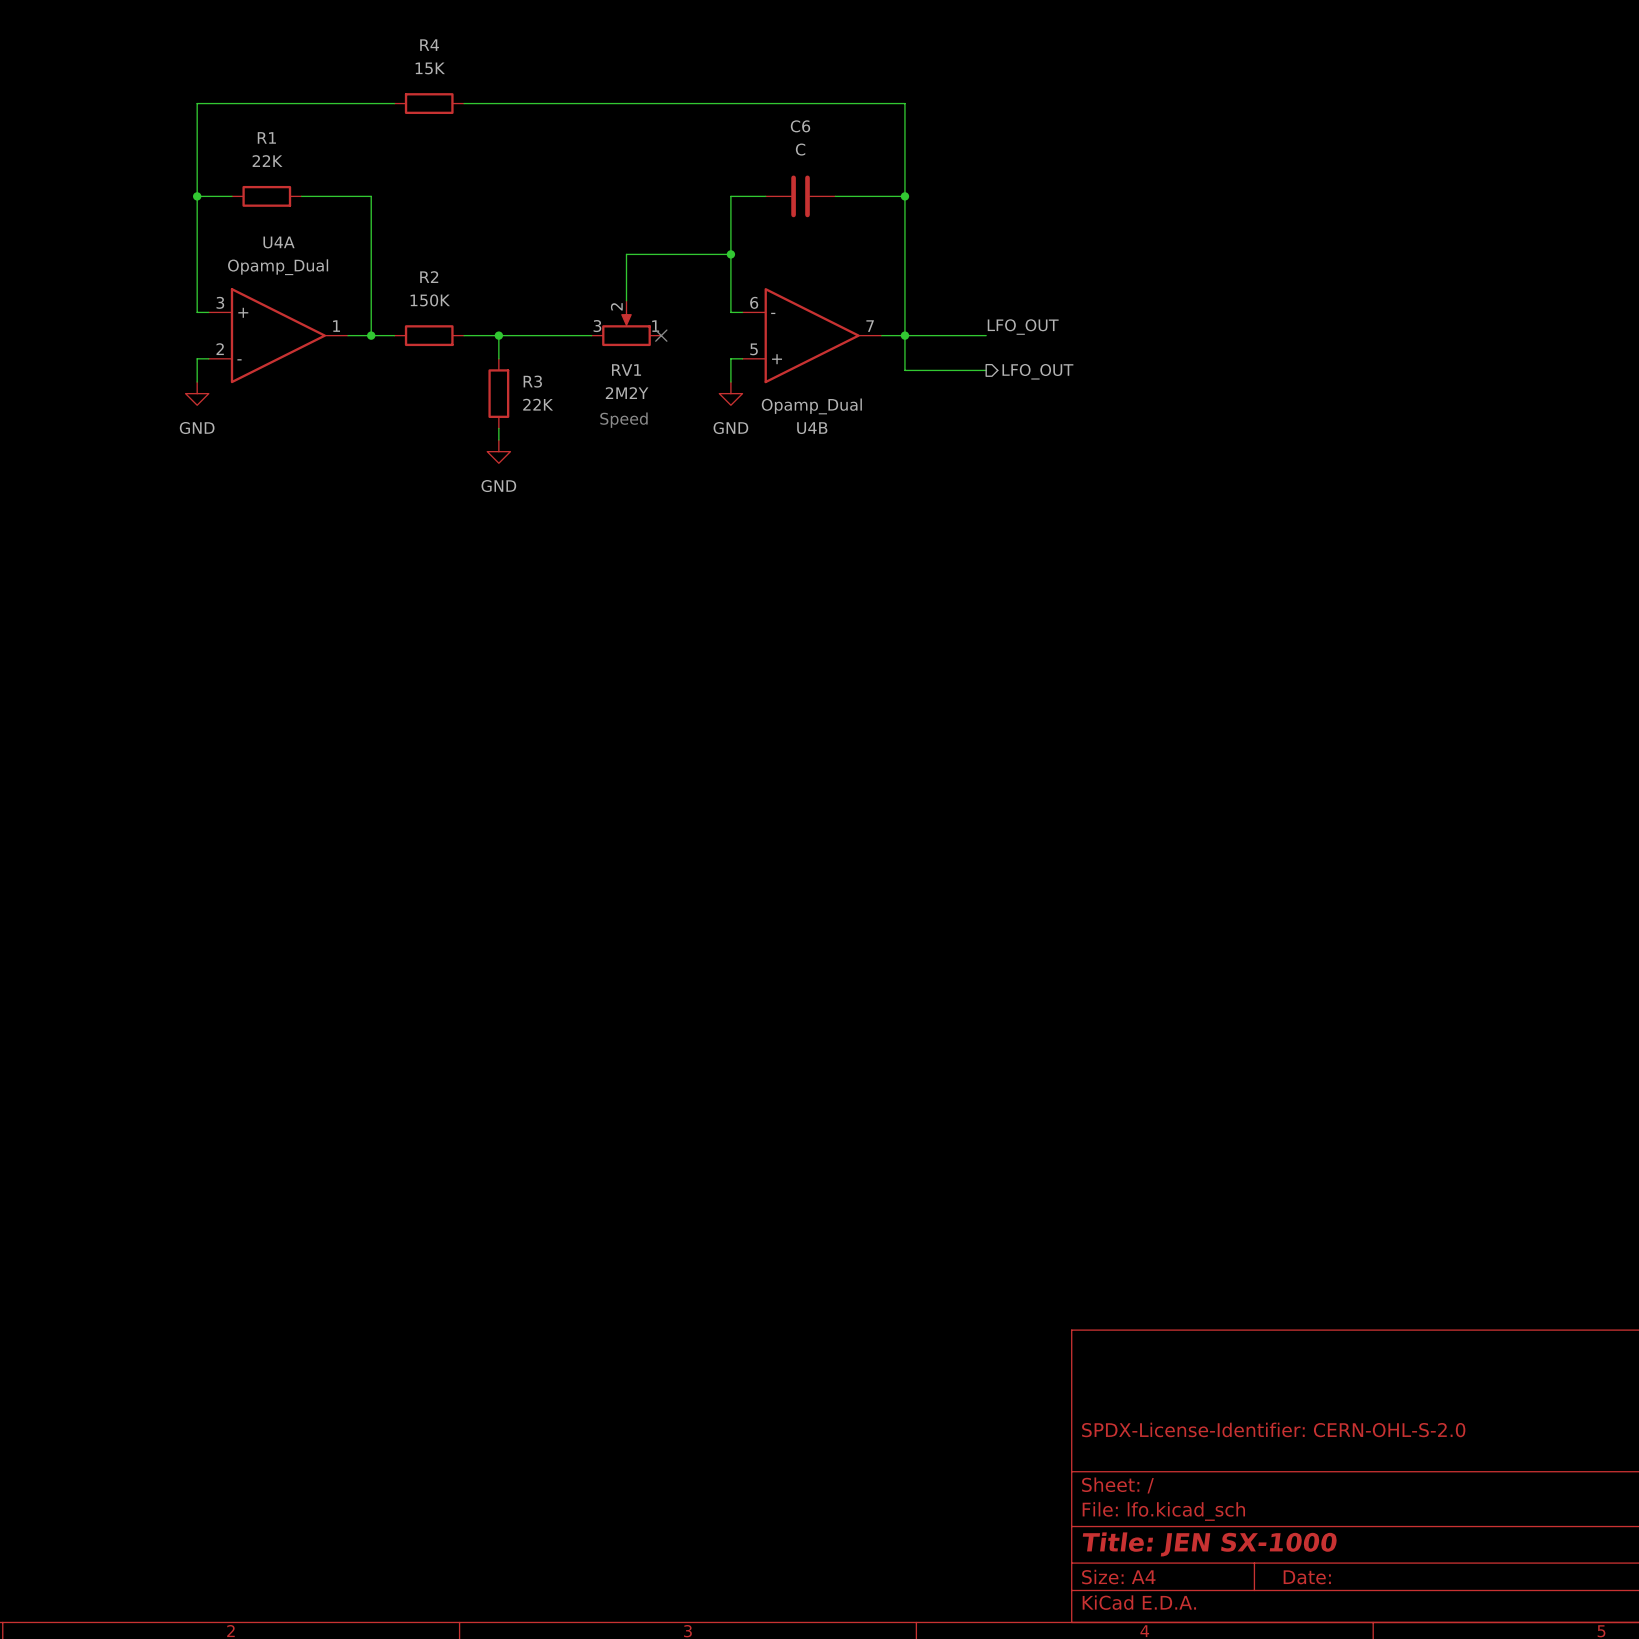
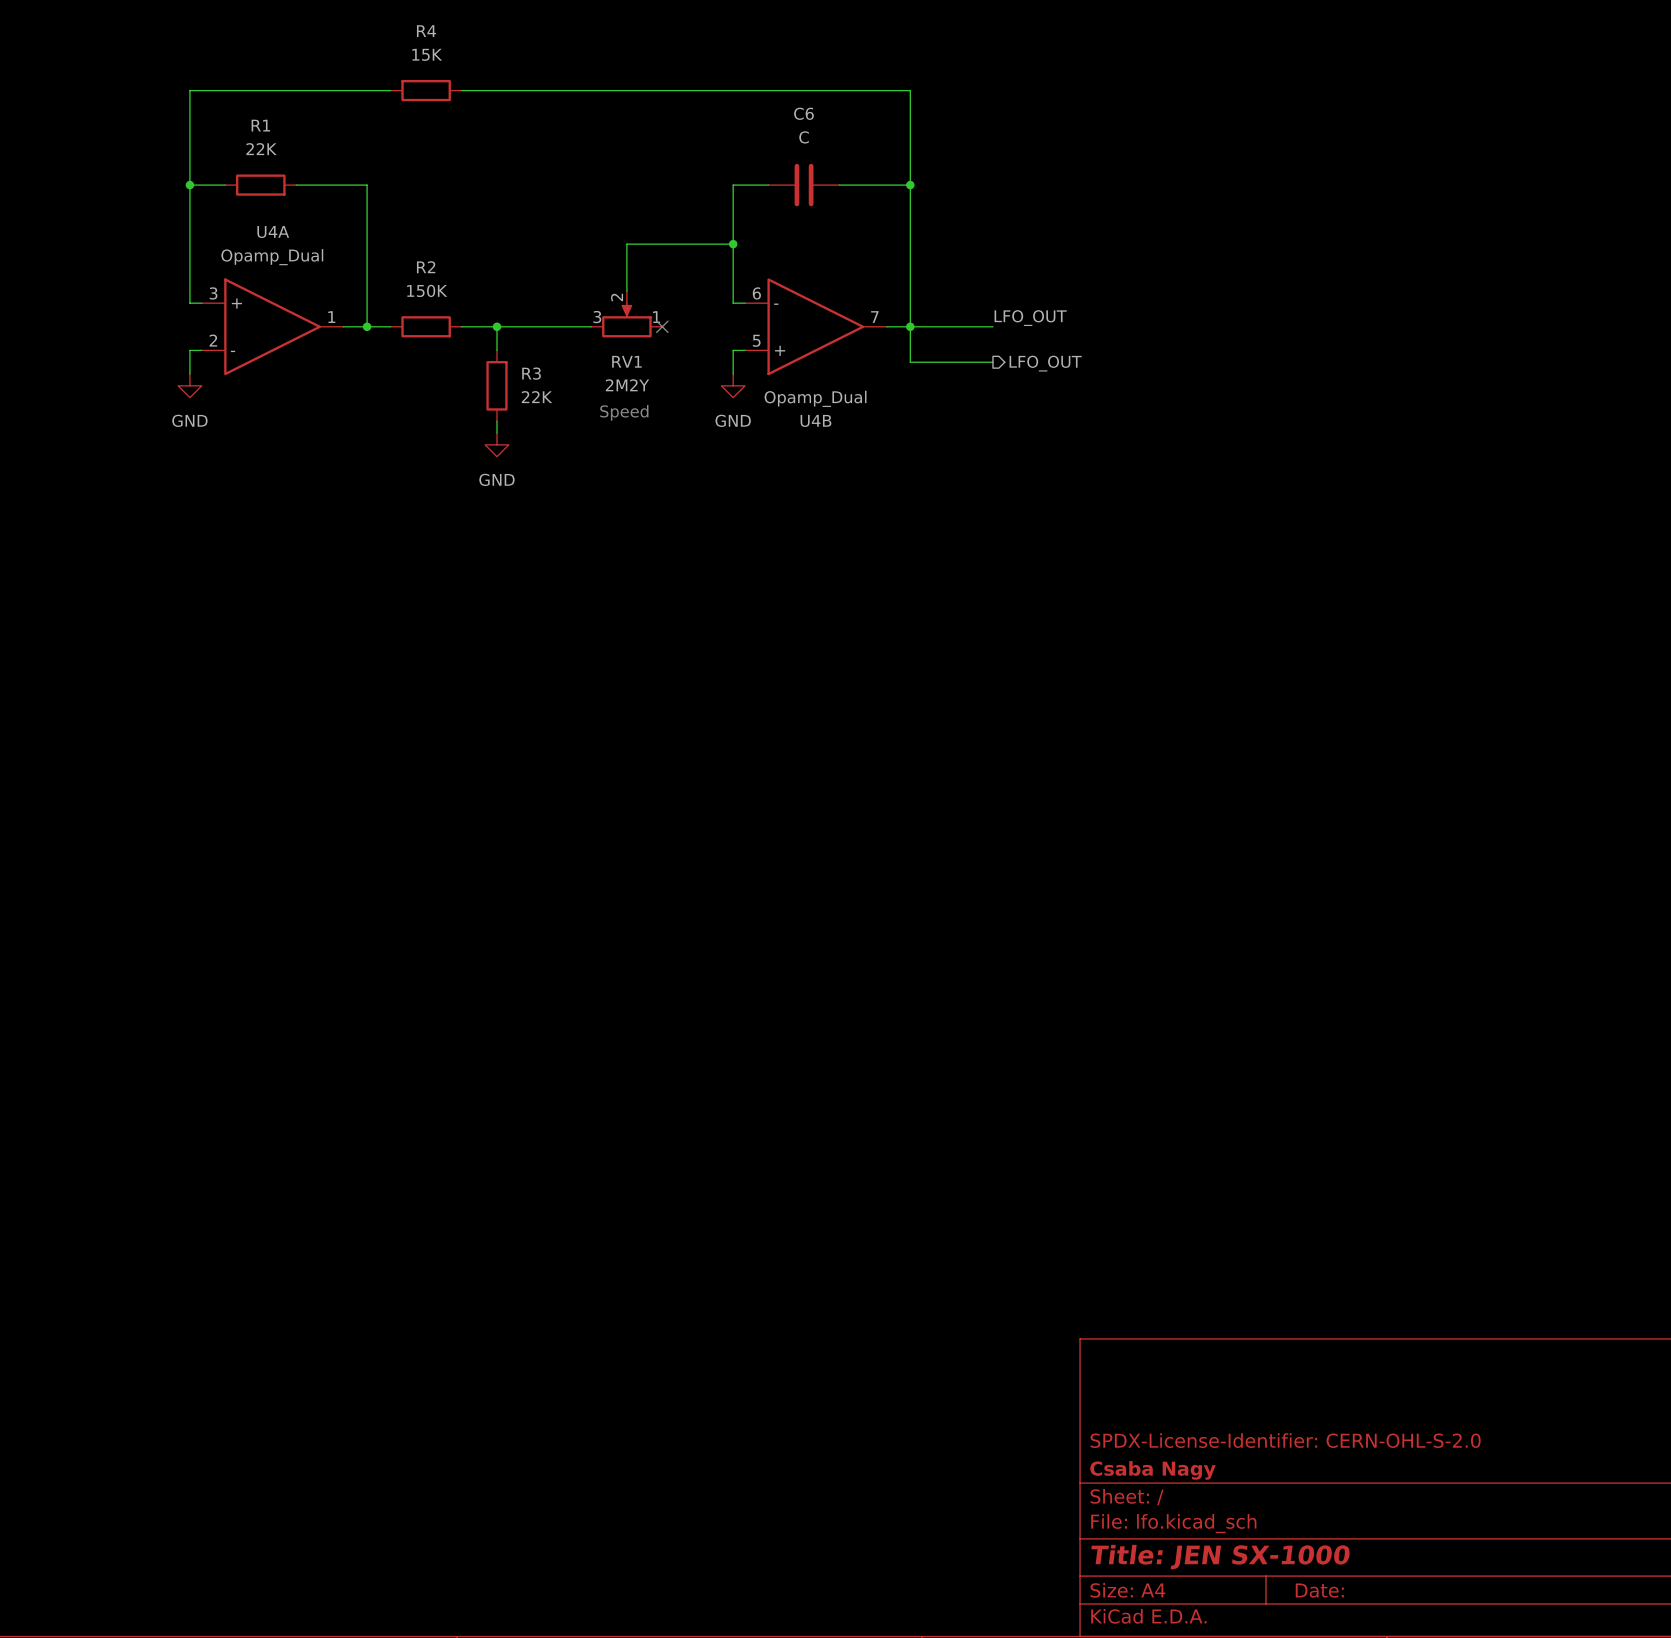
title block: none -> Csaba Nagy (1152, 1470)

